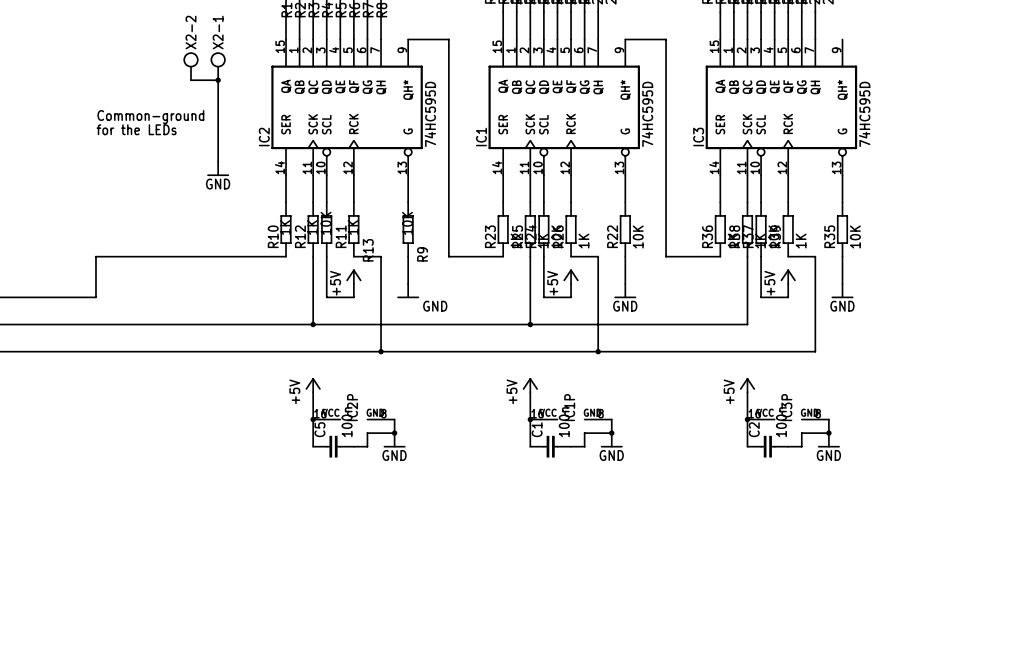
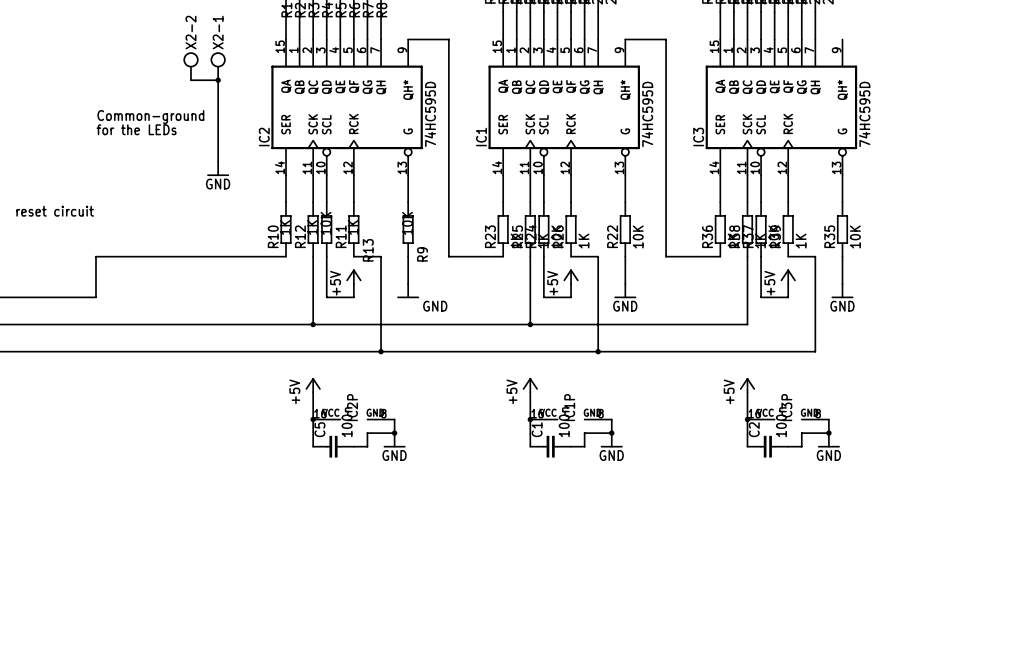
text: none -> reset circuit (55, 211)

